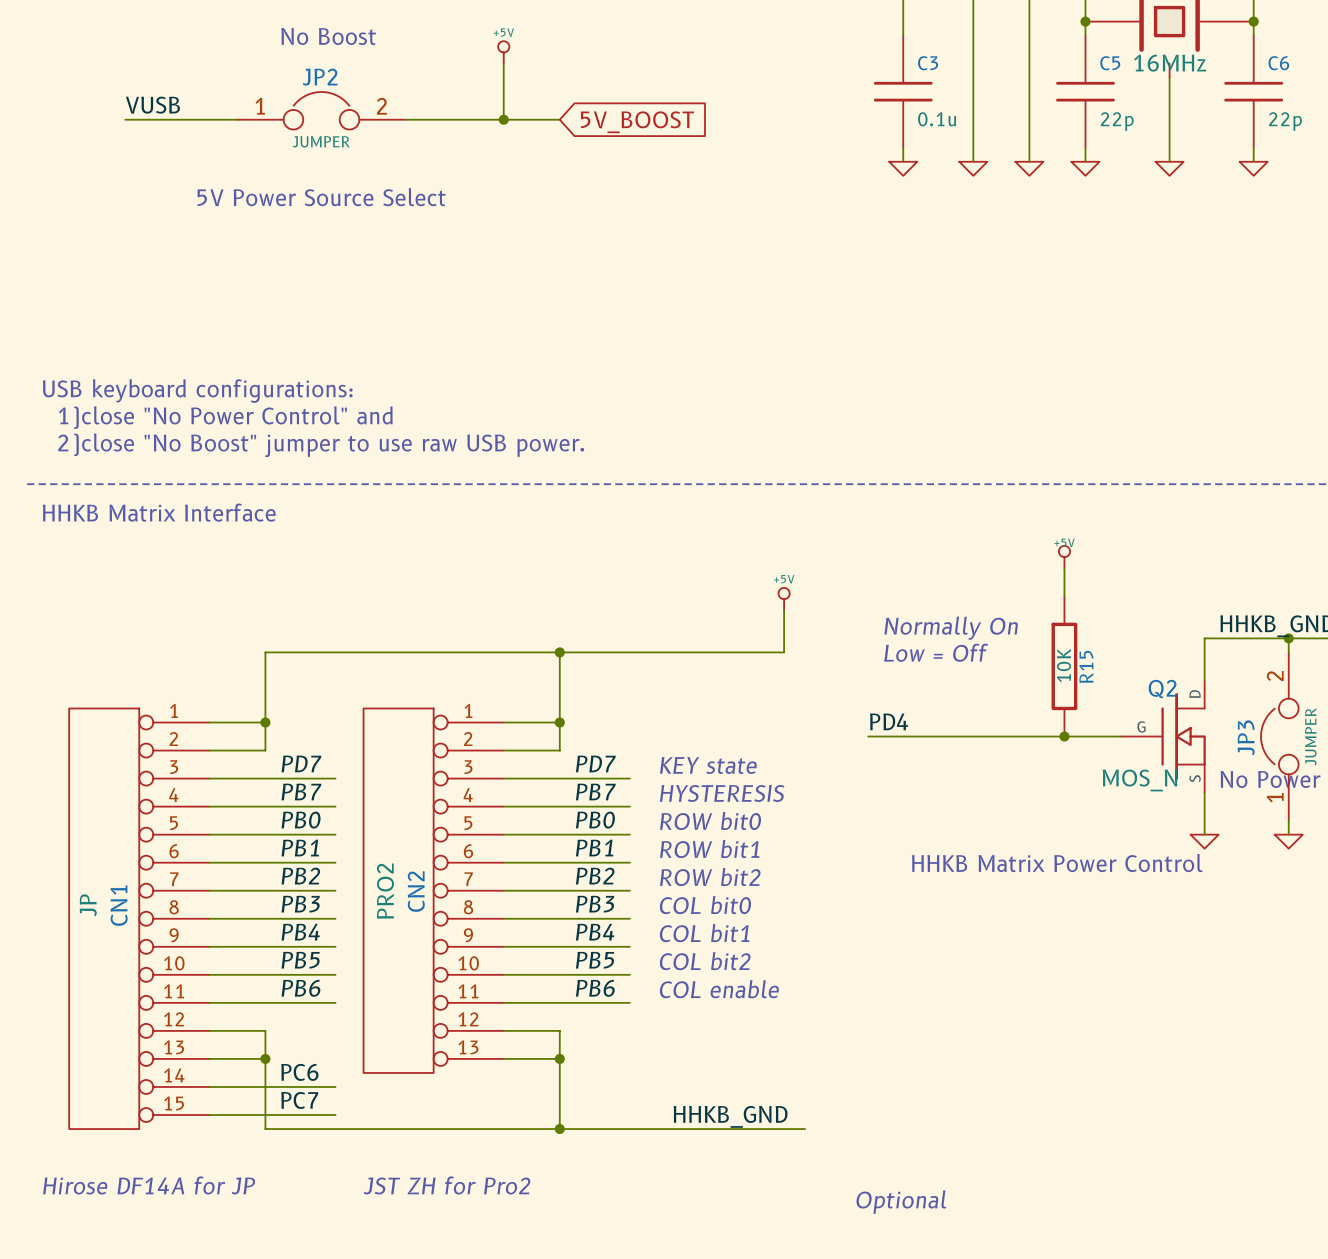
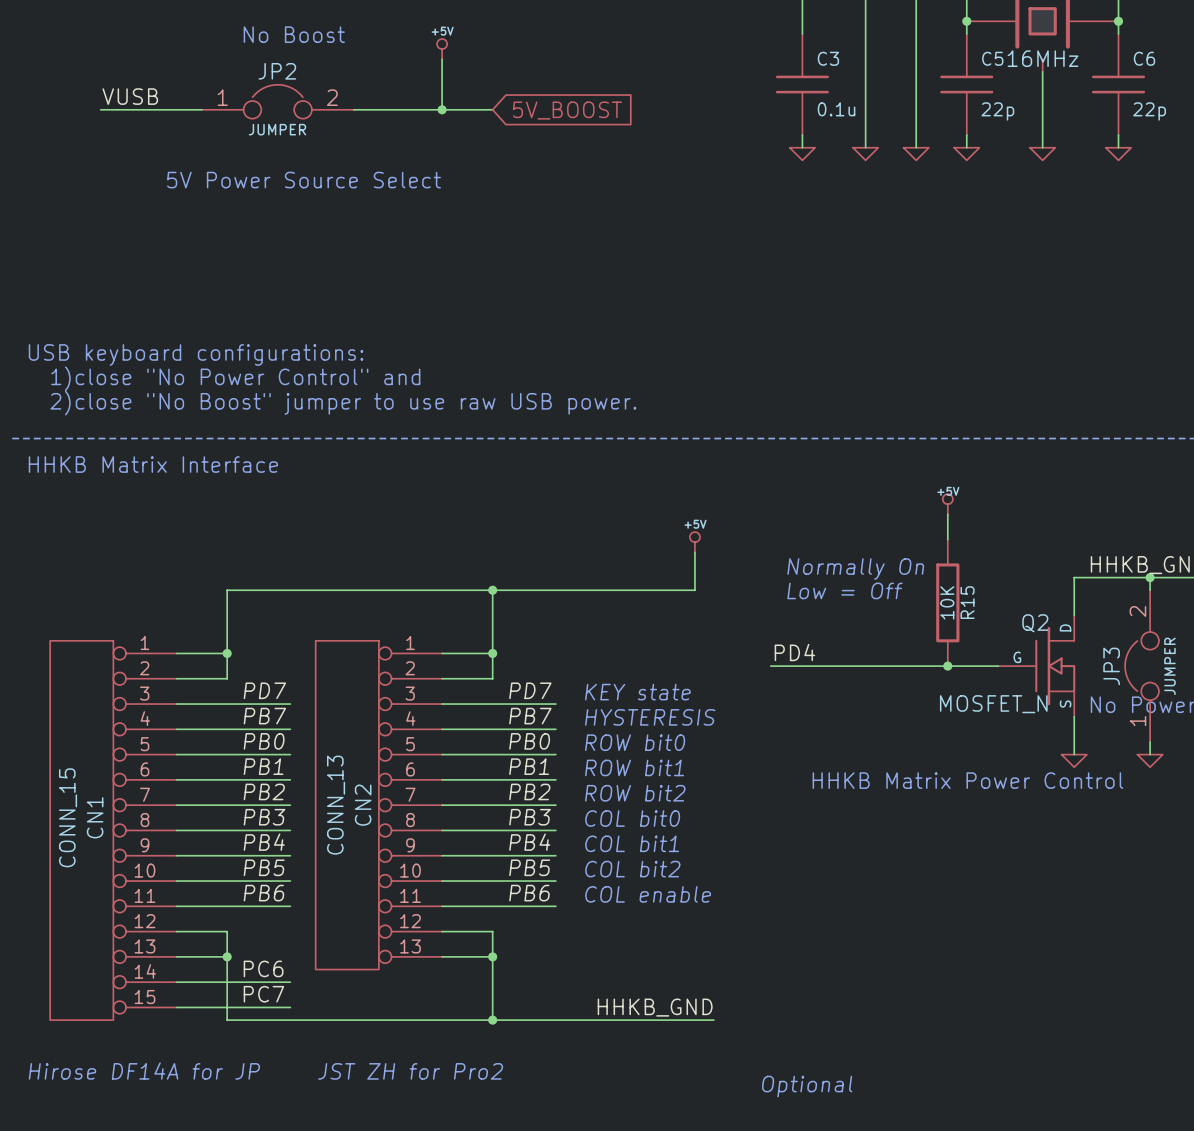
Q2 value: MOS_N (1139, 780) -> MOSFET_N (993, 704)
CN2 value: PRO2 (385, 891) -> CONN_13 (336, 805)
CN1 value: JP (88, 905) -> CONN_15 (68, 817)

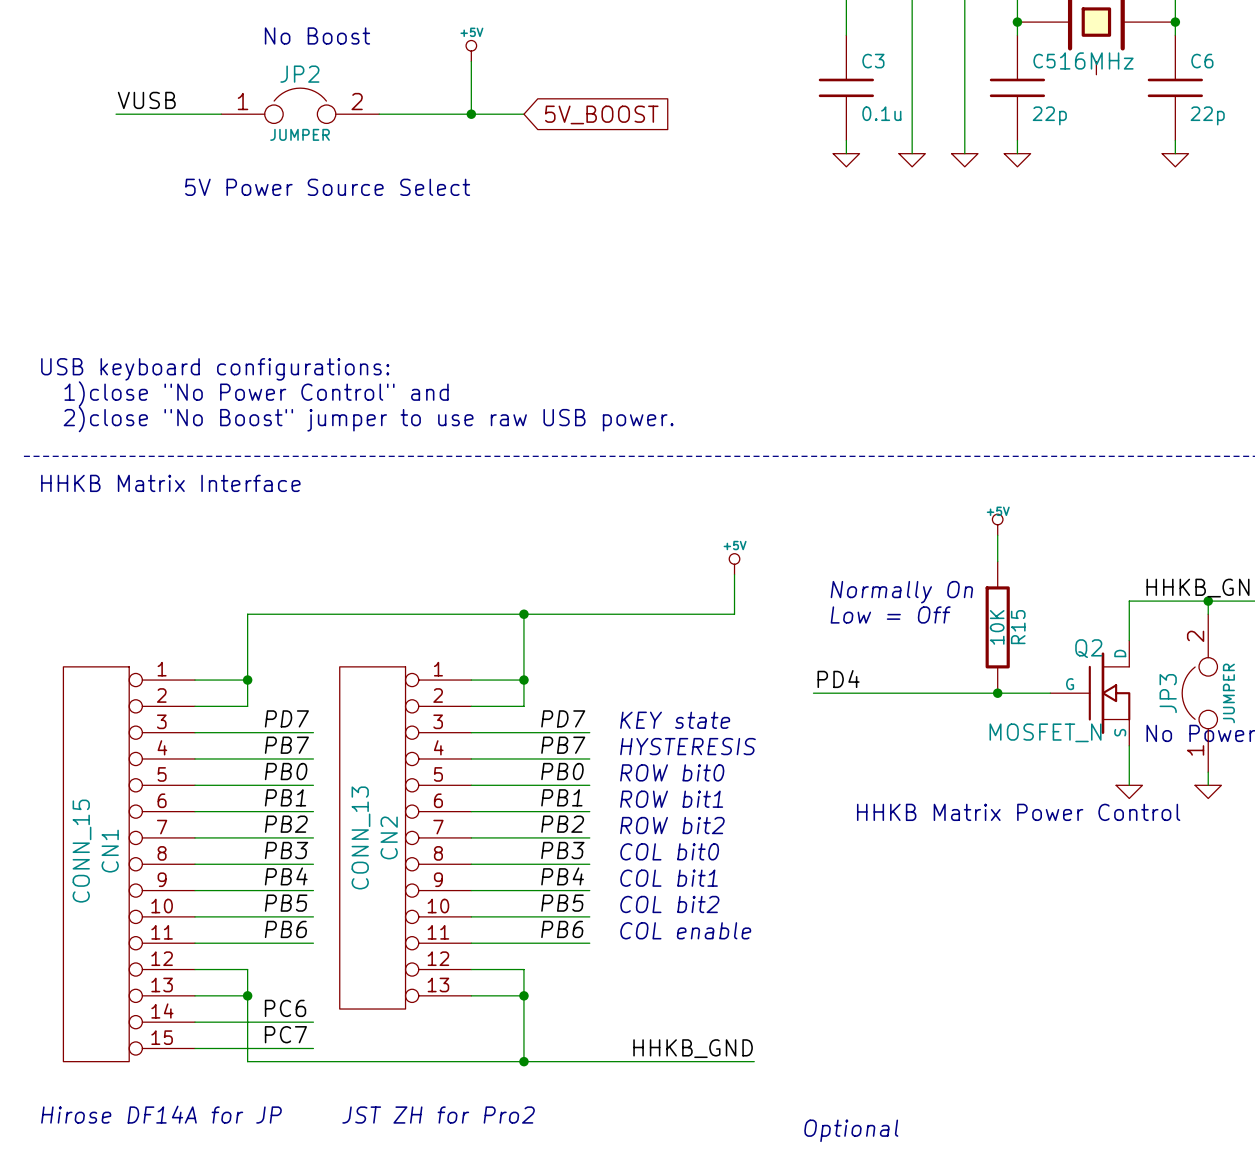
wire: (1042, 71) (1042, 147) -> none
power symbol: (1042, 154) -> none

